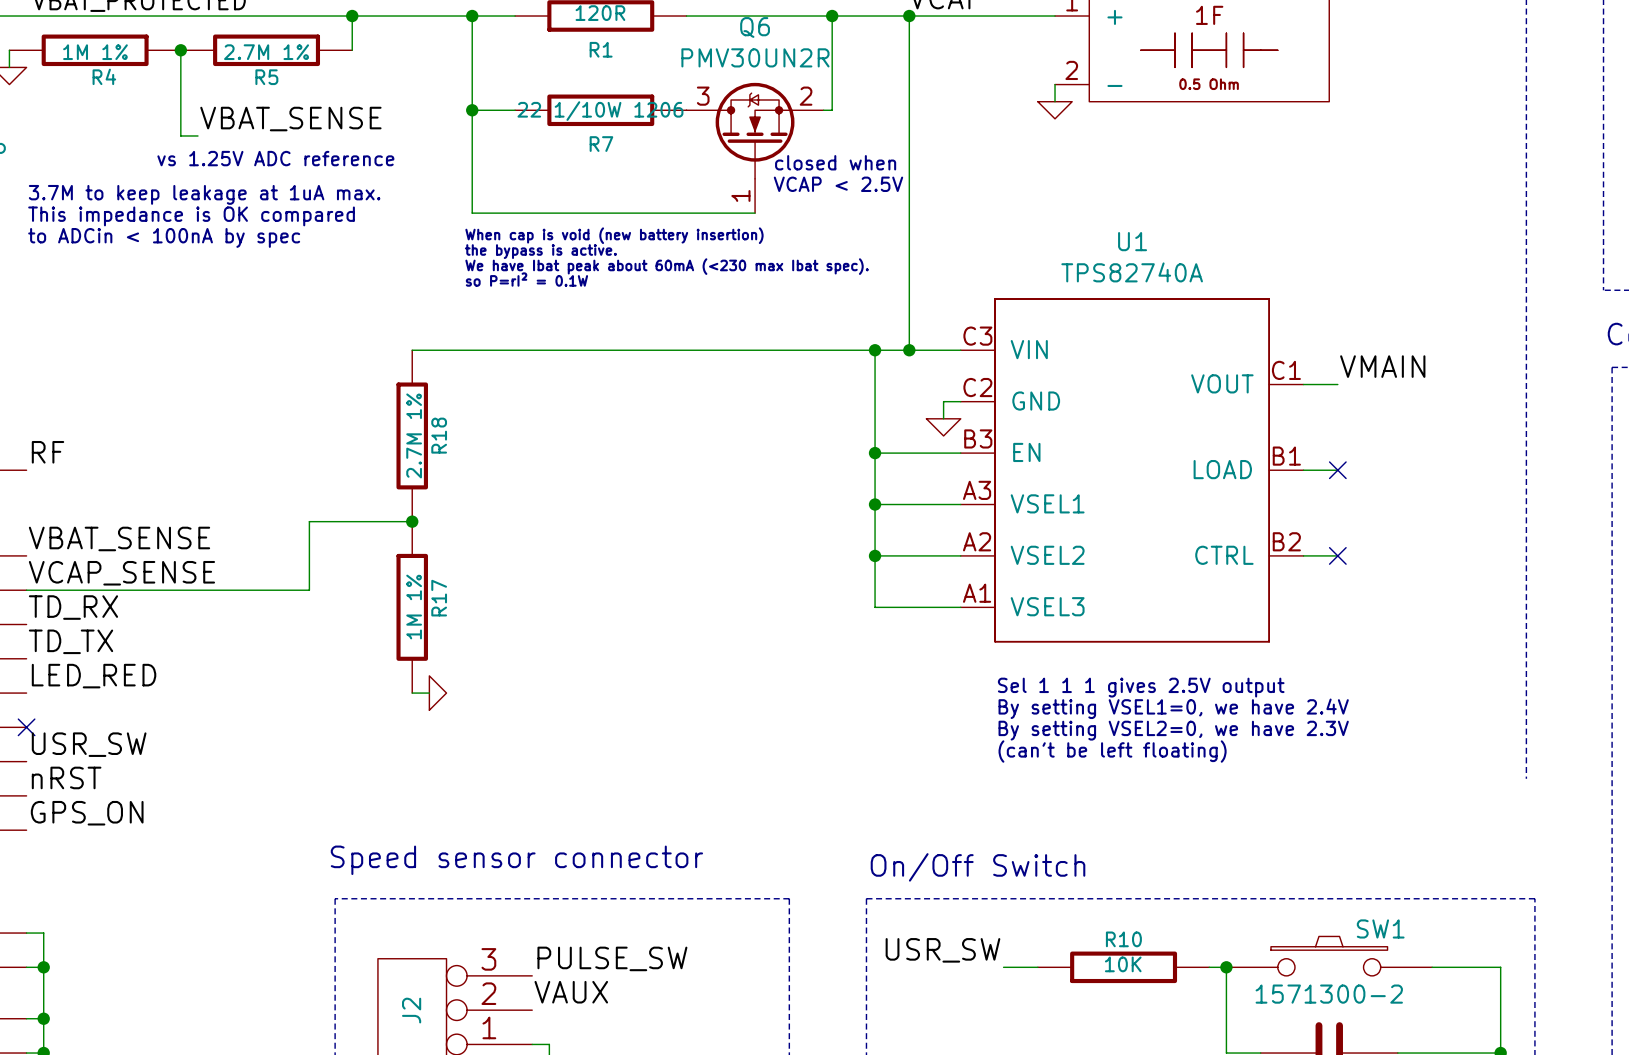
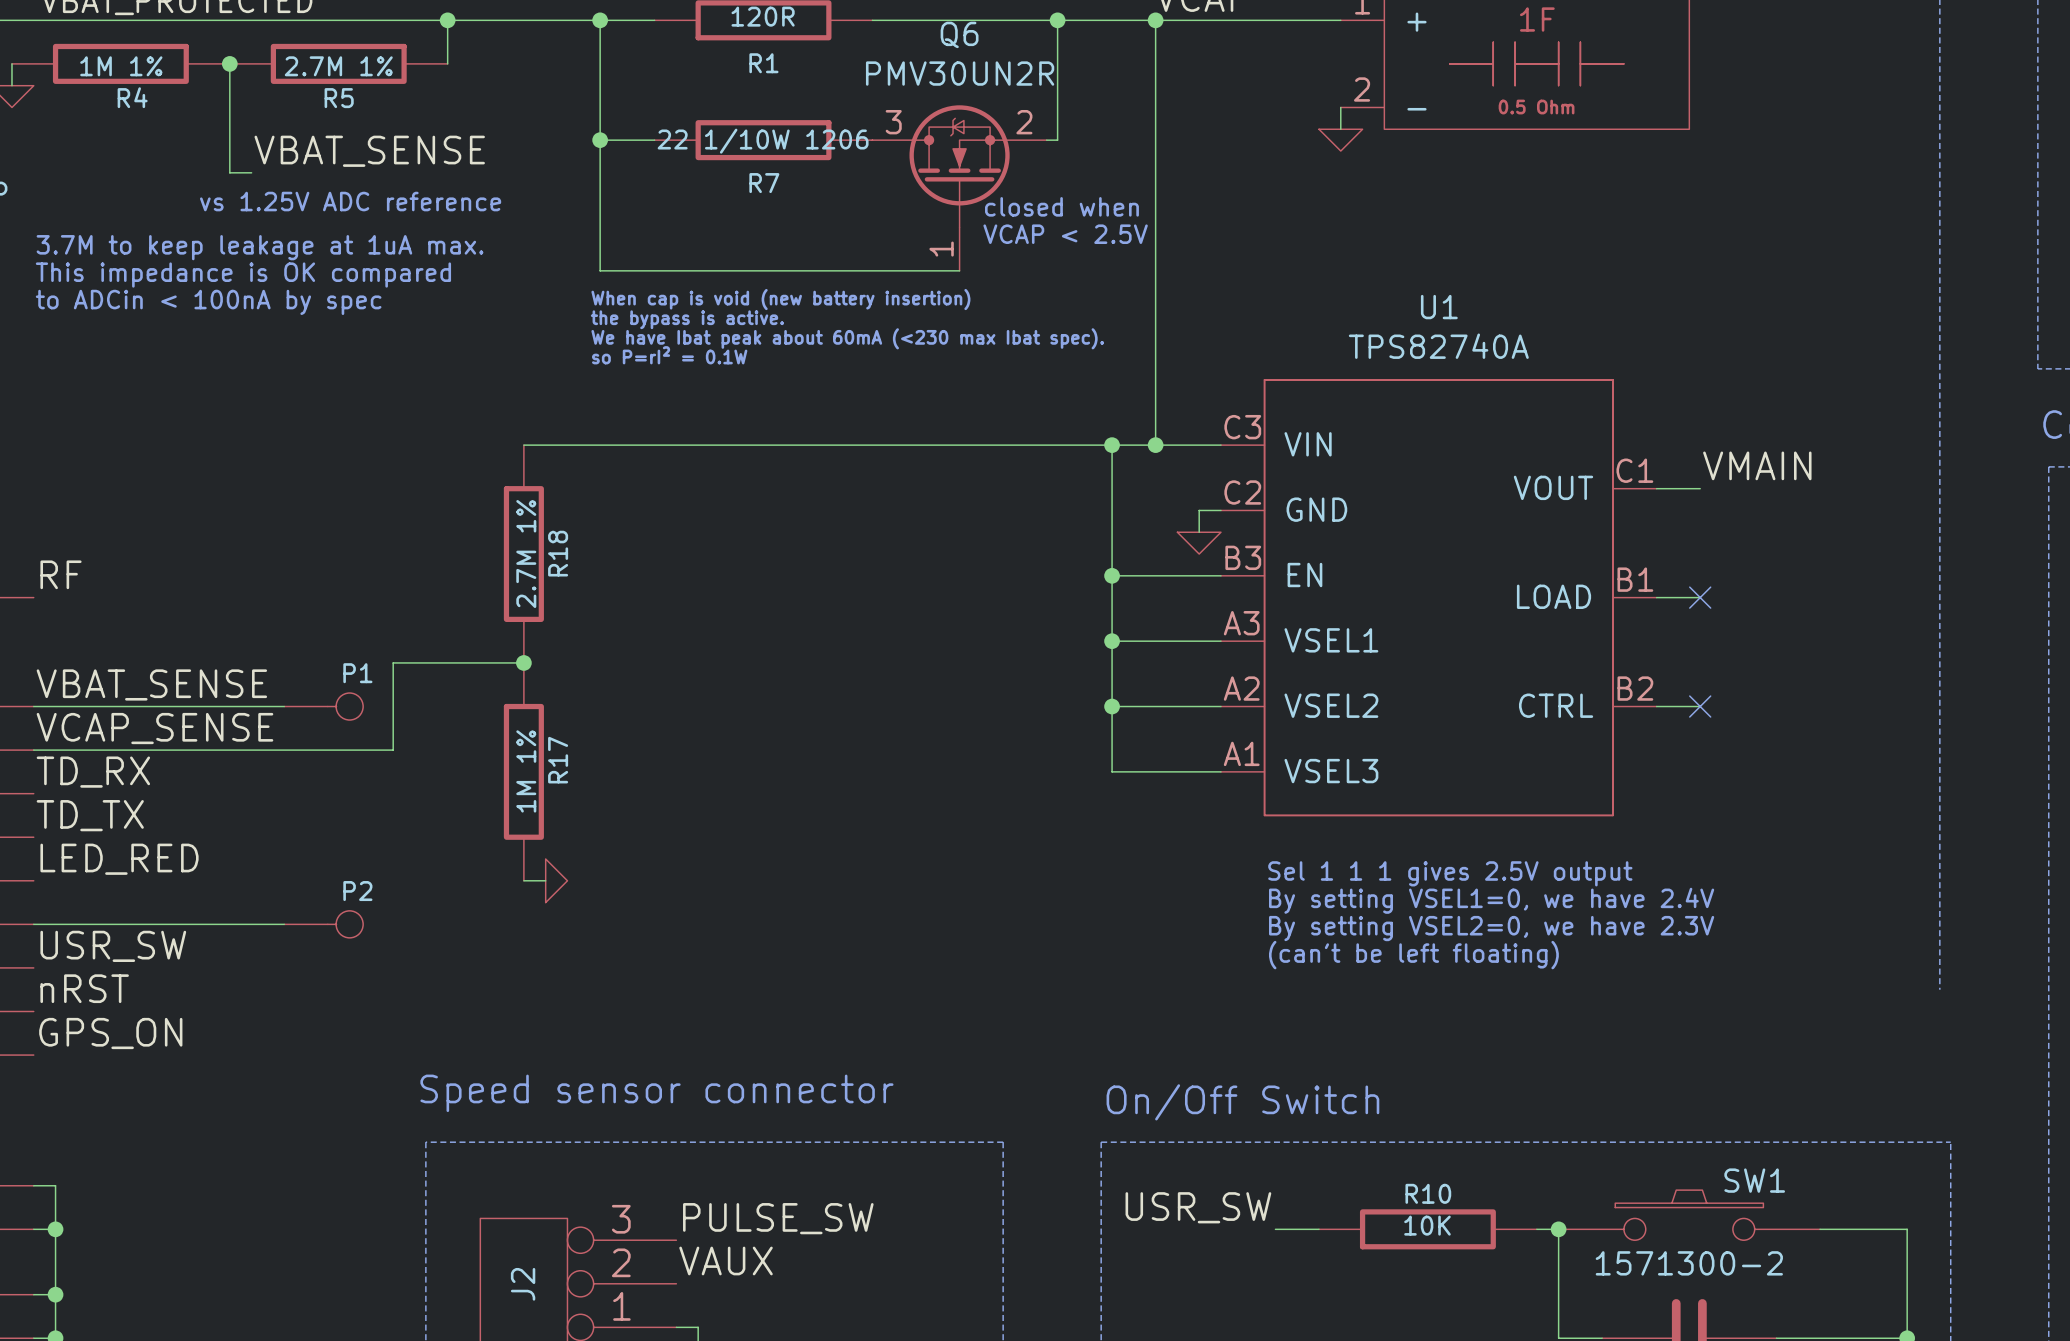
wire: none -> (33, 706) (284, 706)
P1: none -> (323, 706)
wire: none -> (33, 924) (284, 924)
no-connect mark: (26, 727) -> none
P2: none -> (323, 924)

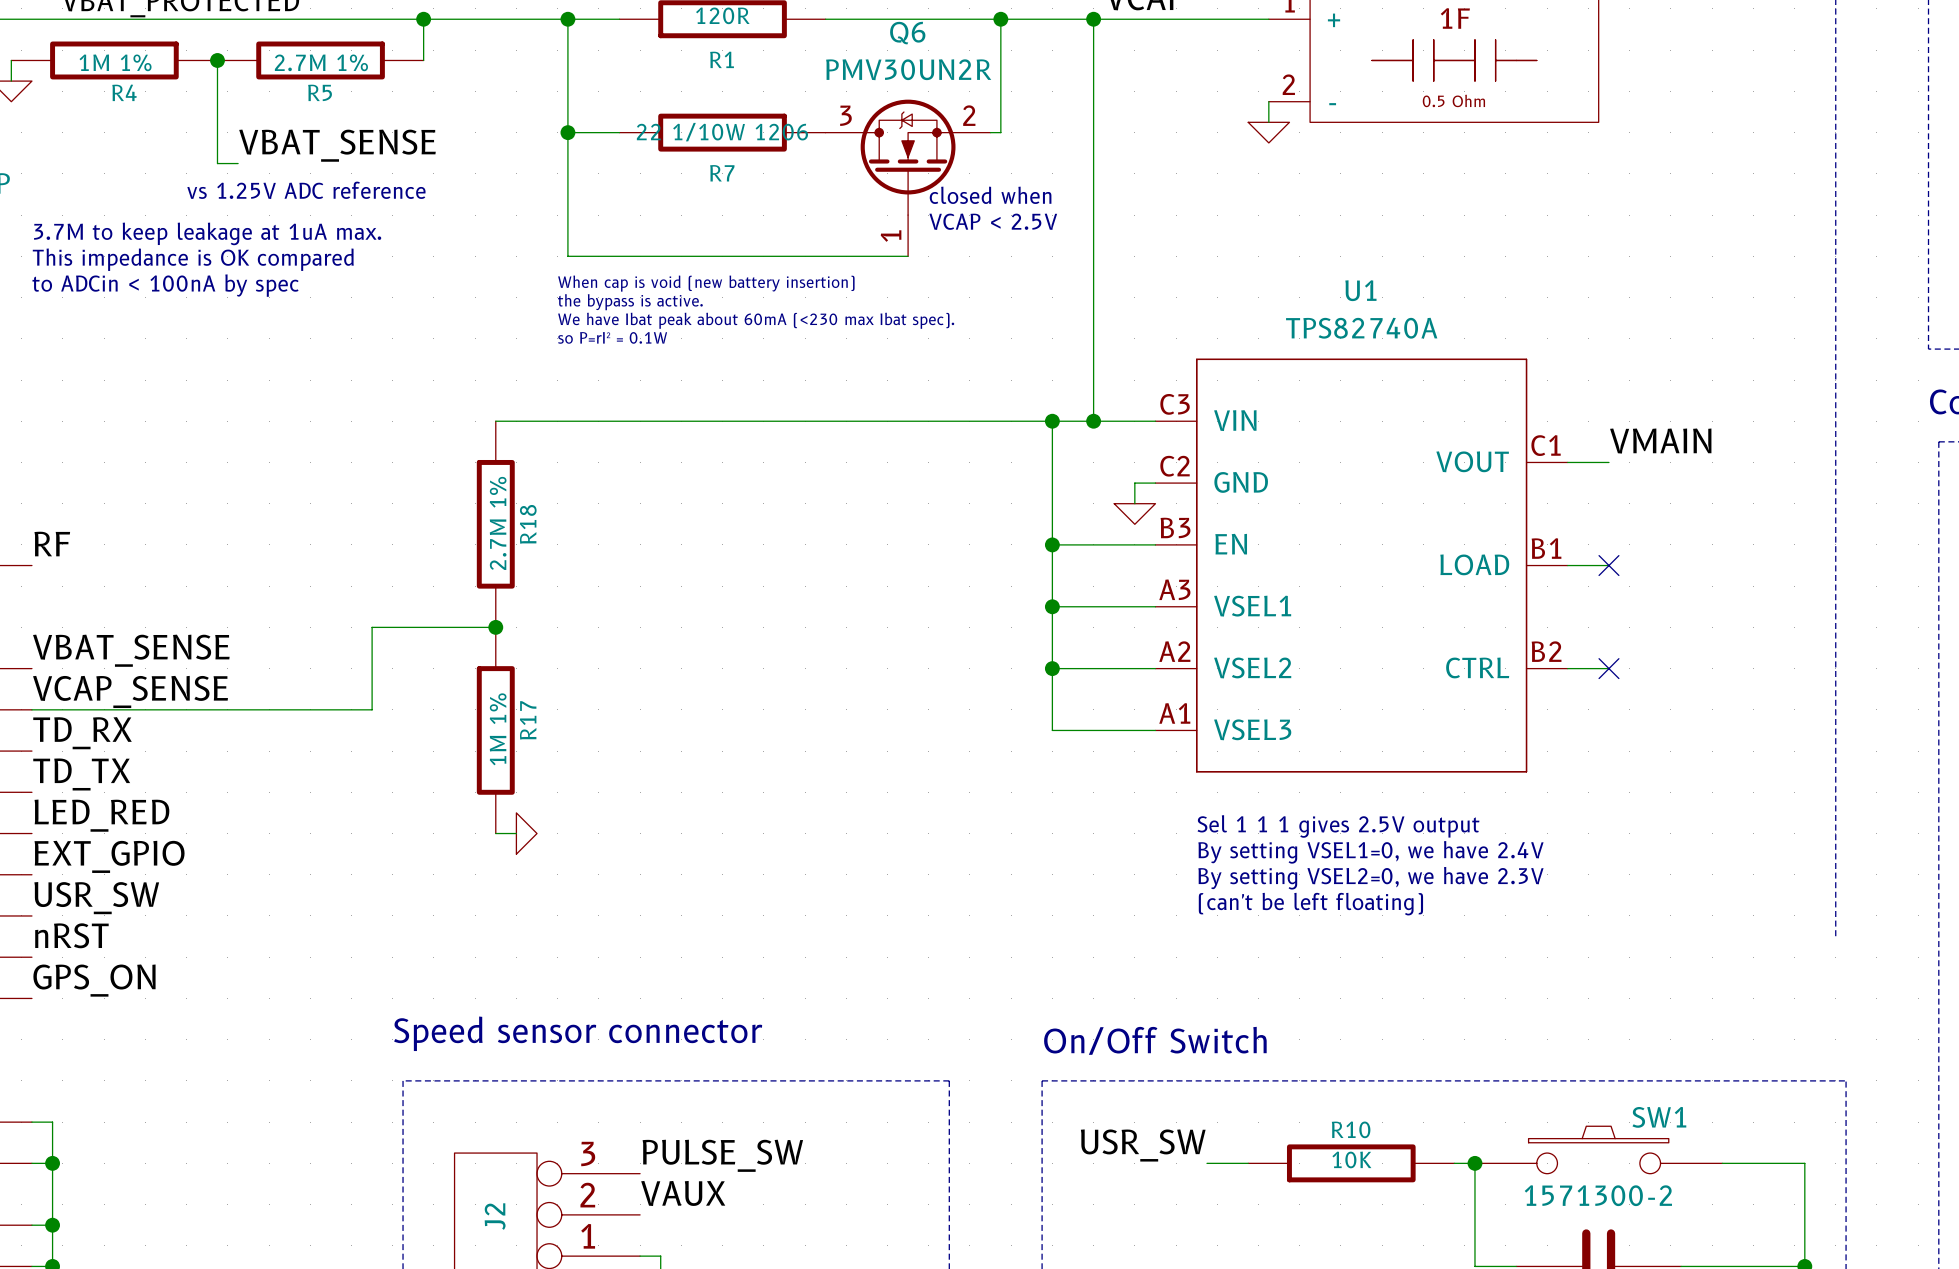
wire: (33, 706) (284, 706) -> none
P1: (323, 706) -> none
label: none -> EXT_GPIO (109, 856)
wire: (33, 924) (284, 924) -> none
P2: (323, 924) -> none

